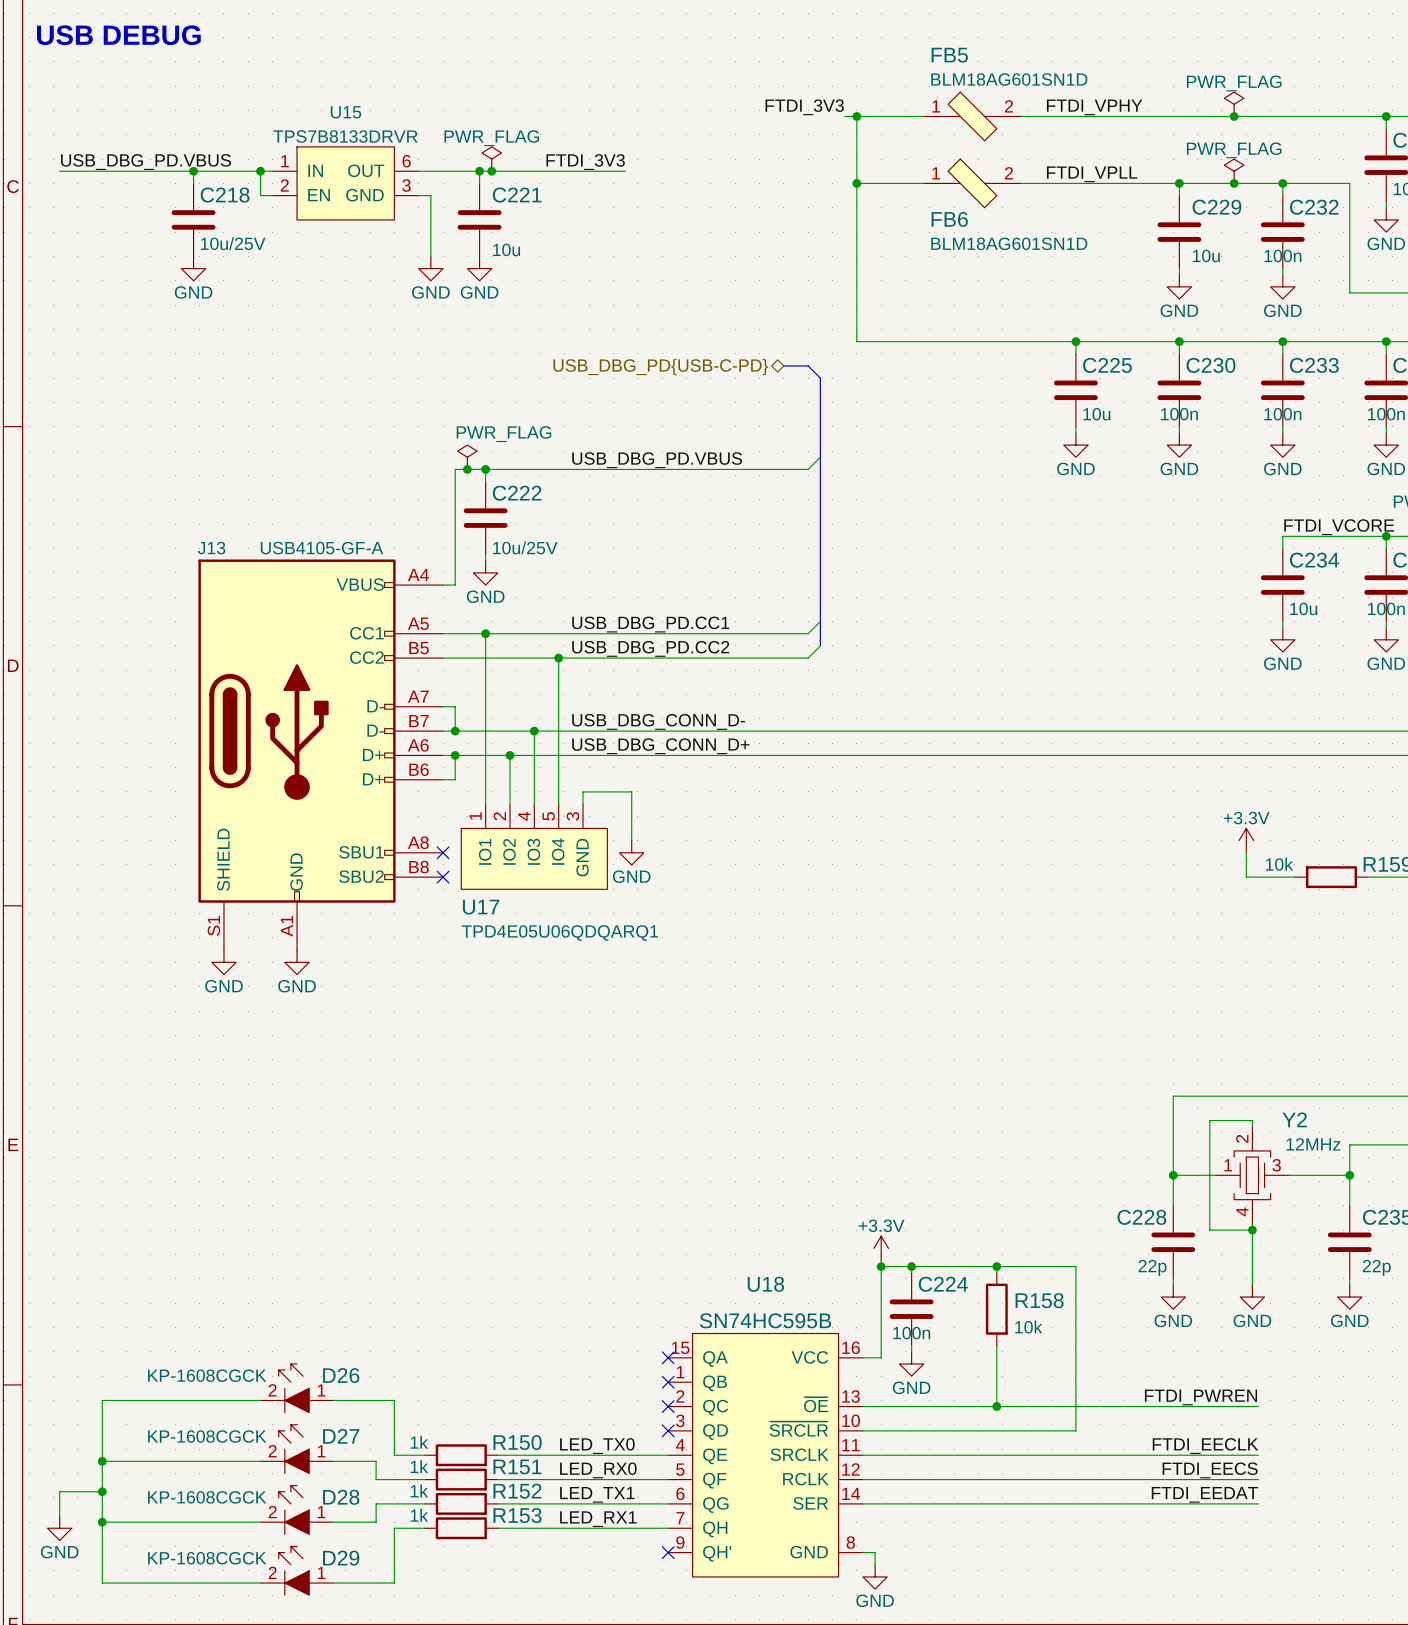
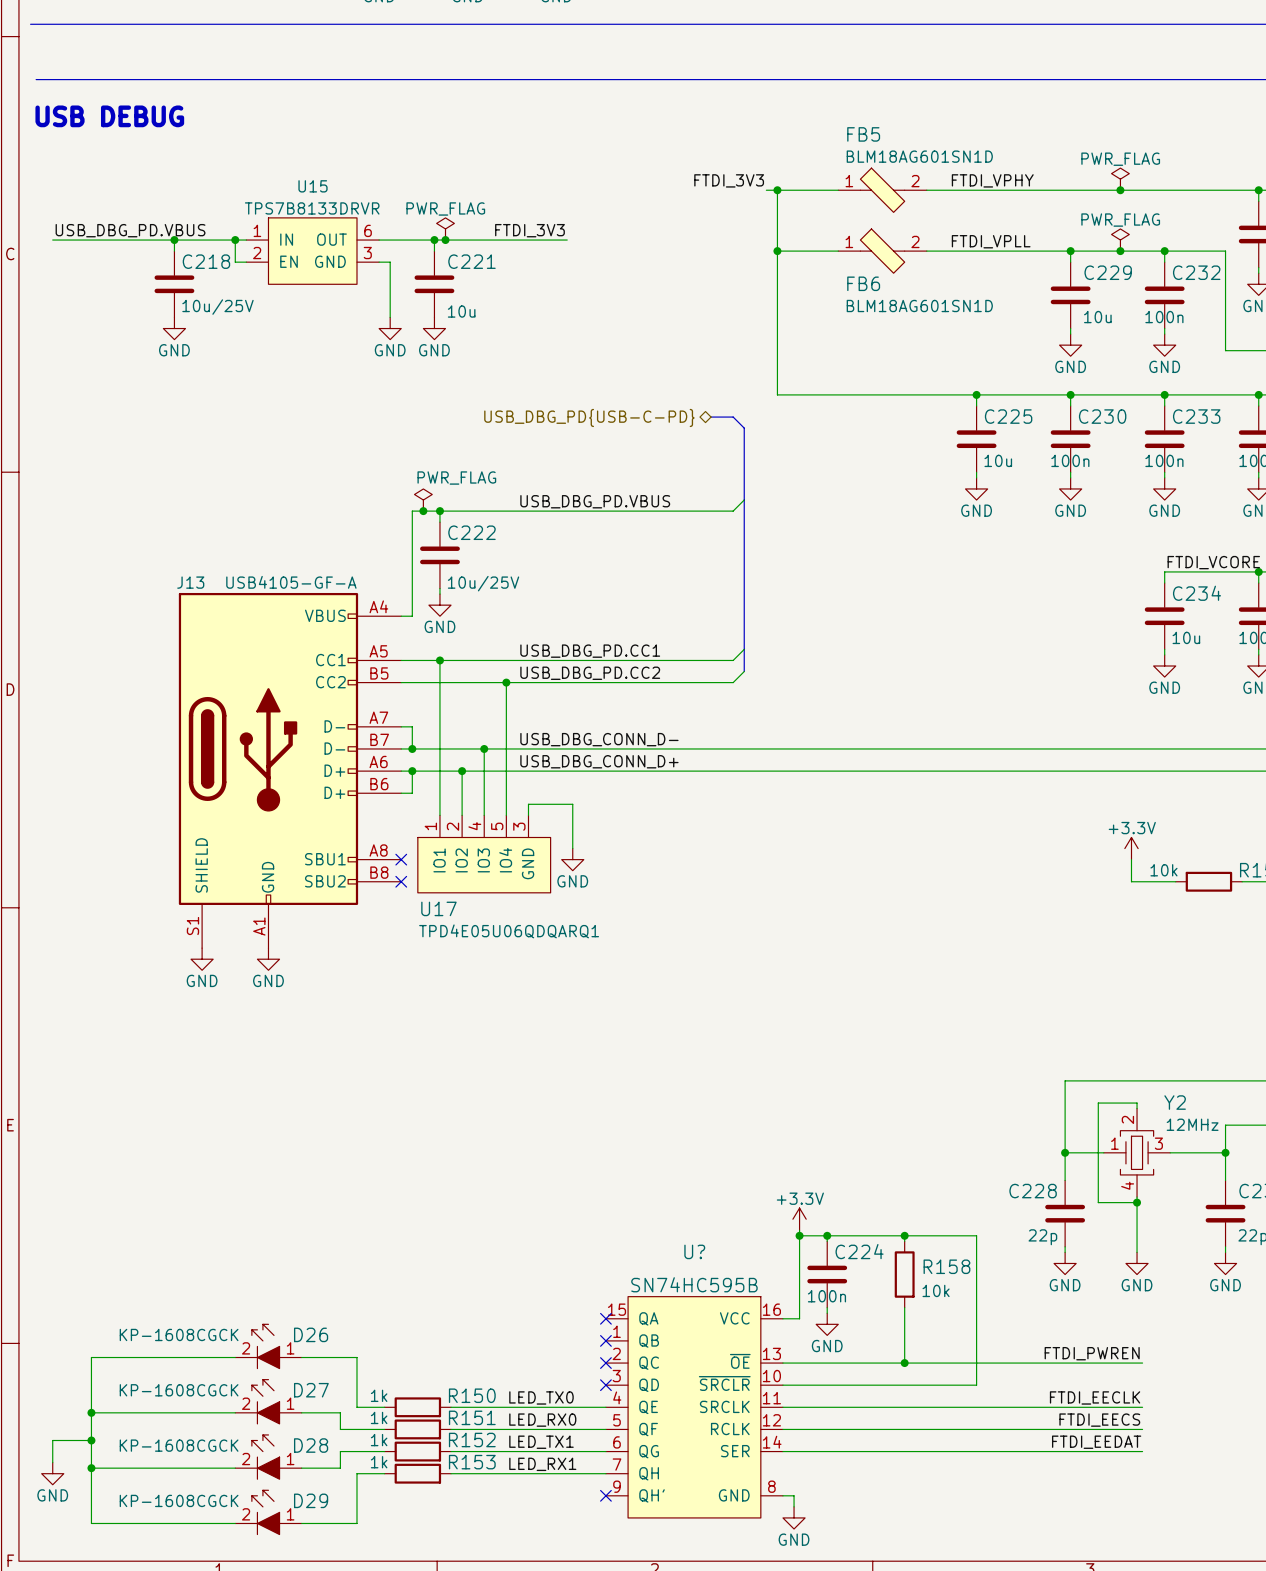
U18 name: U18 (765, 1284) -> U? (694, 1251)

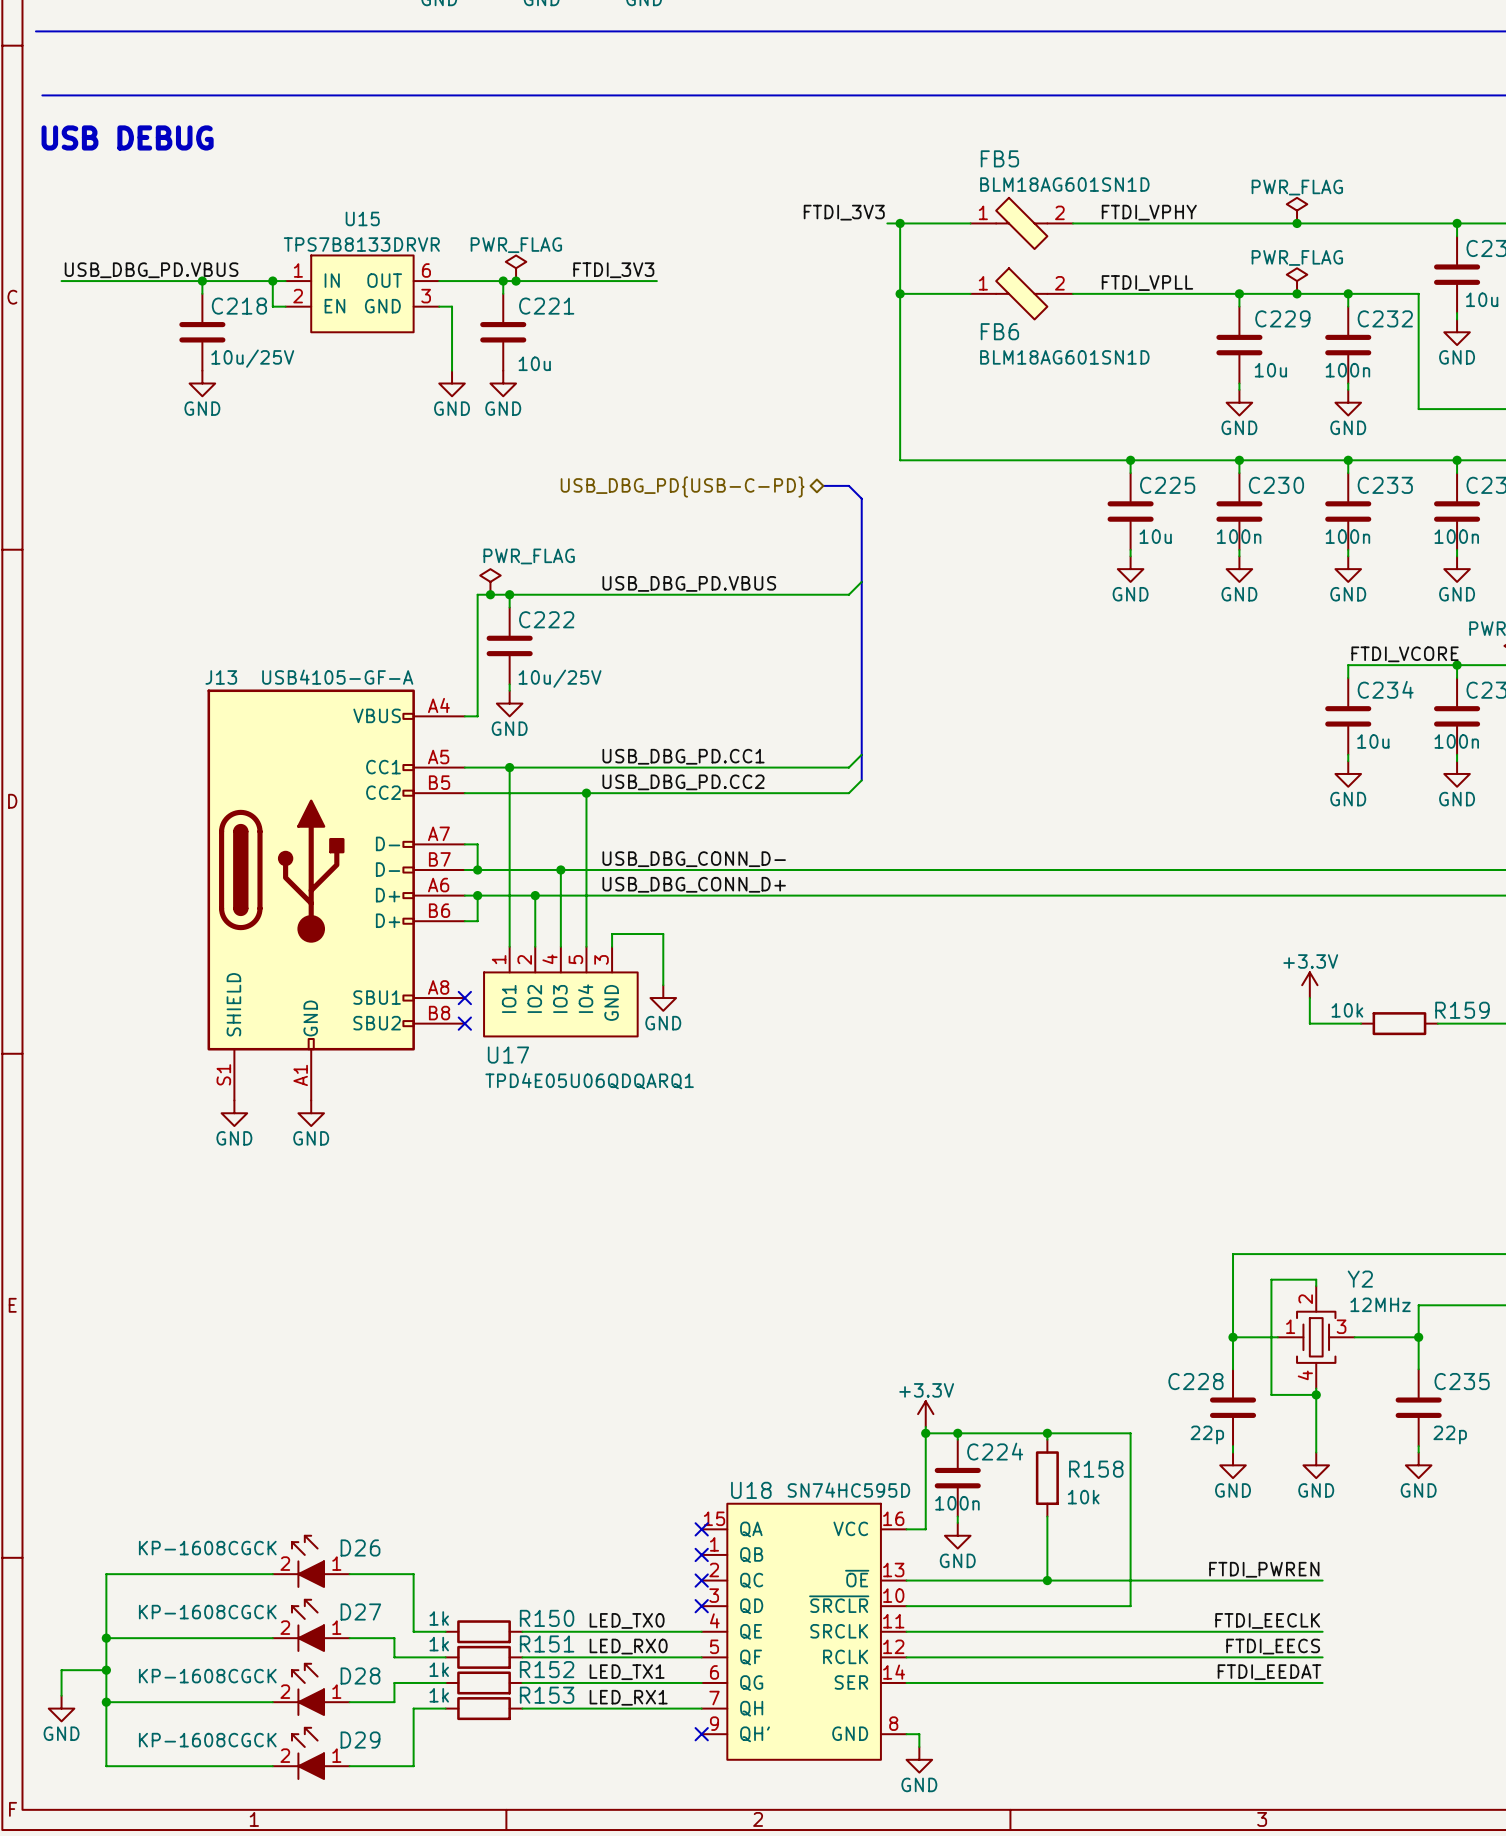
U? name: U? (694, 1251) -> U18 (751, 1490)
U? value: SN74HC595B (694, 1284) -> SN74HC595D (848, 1490)

